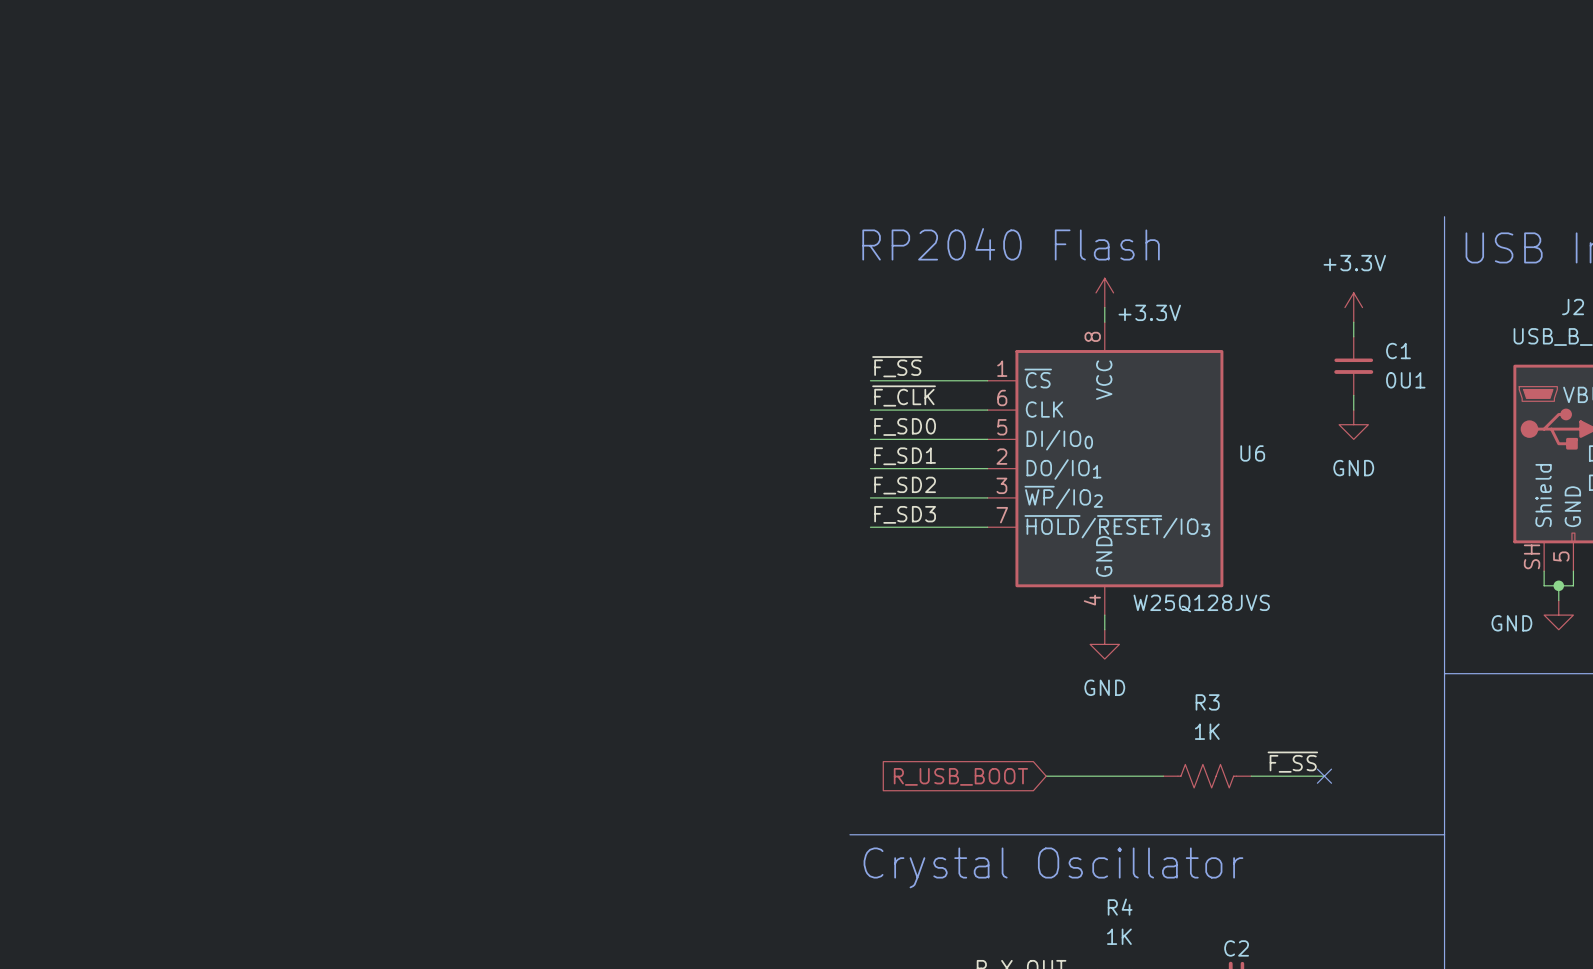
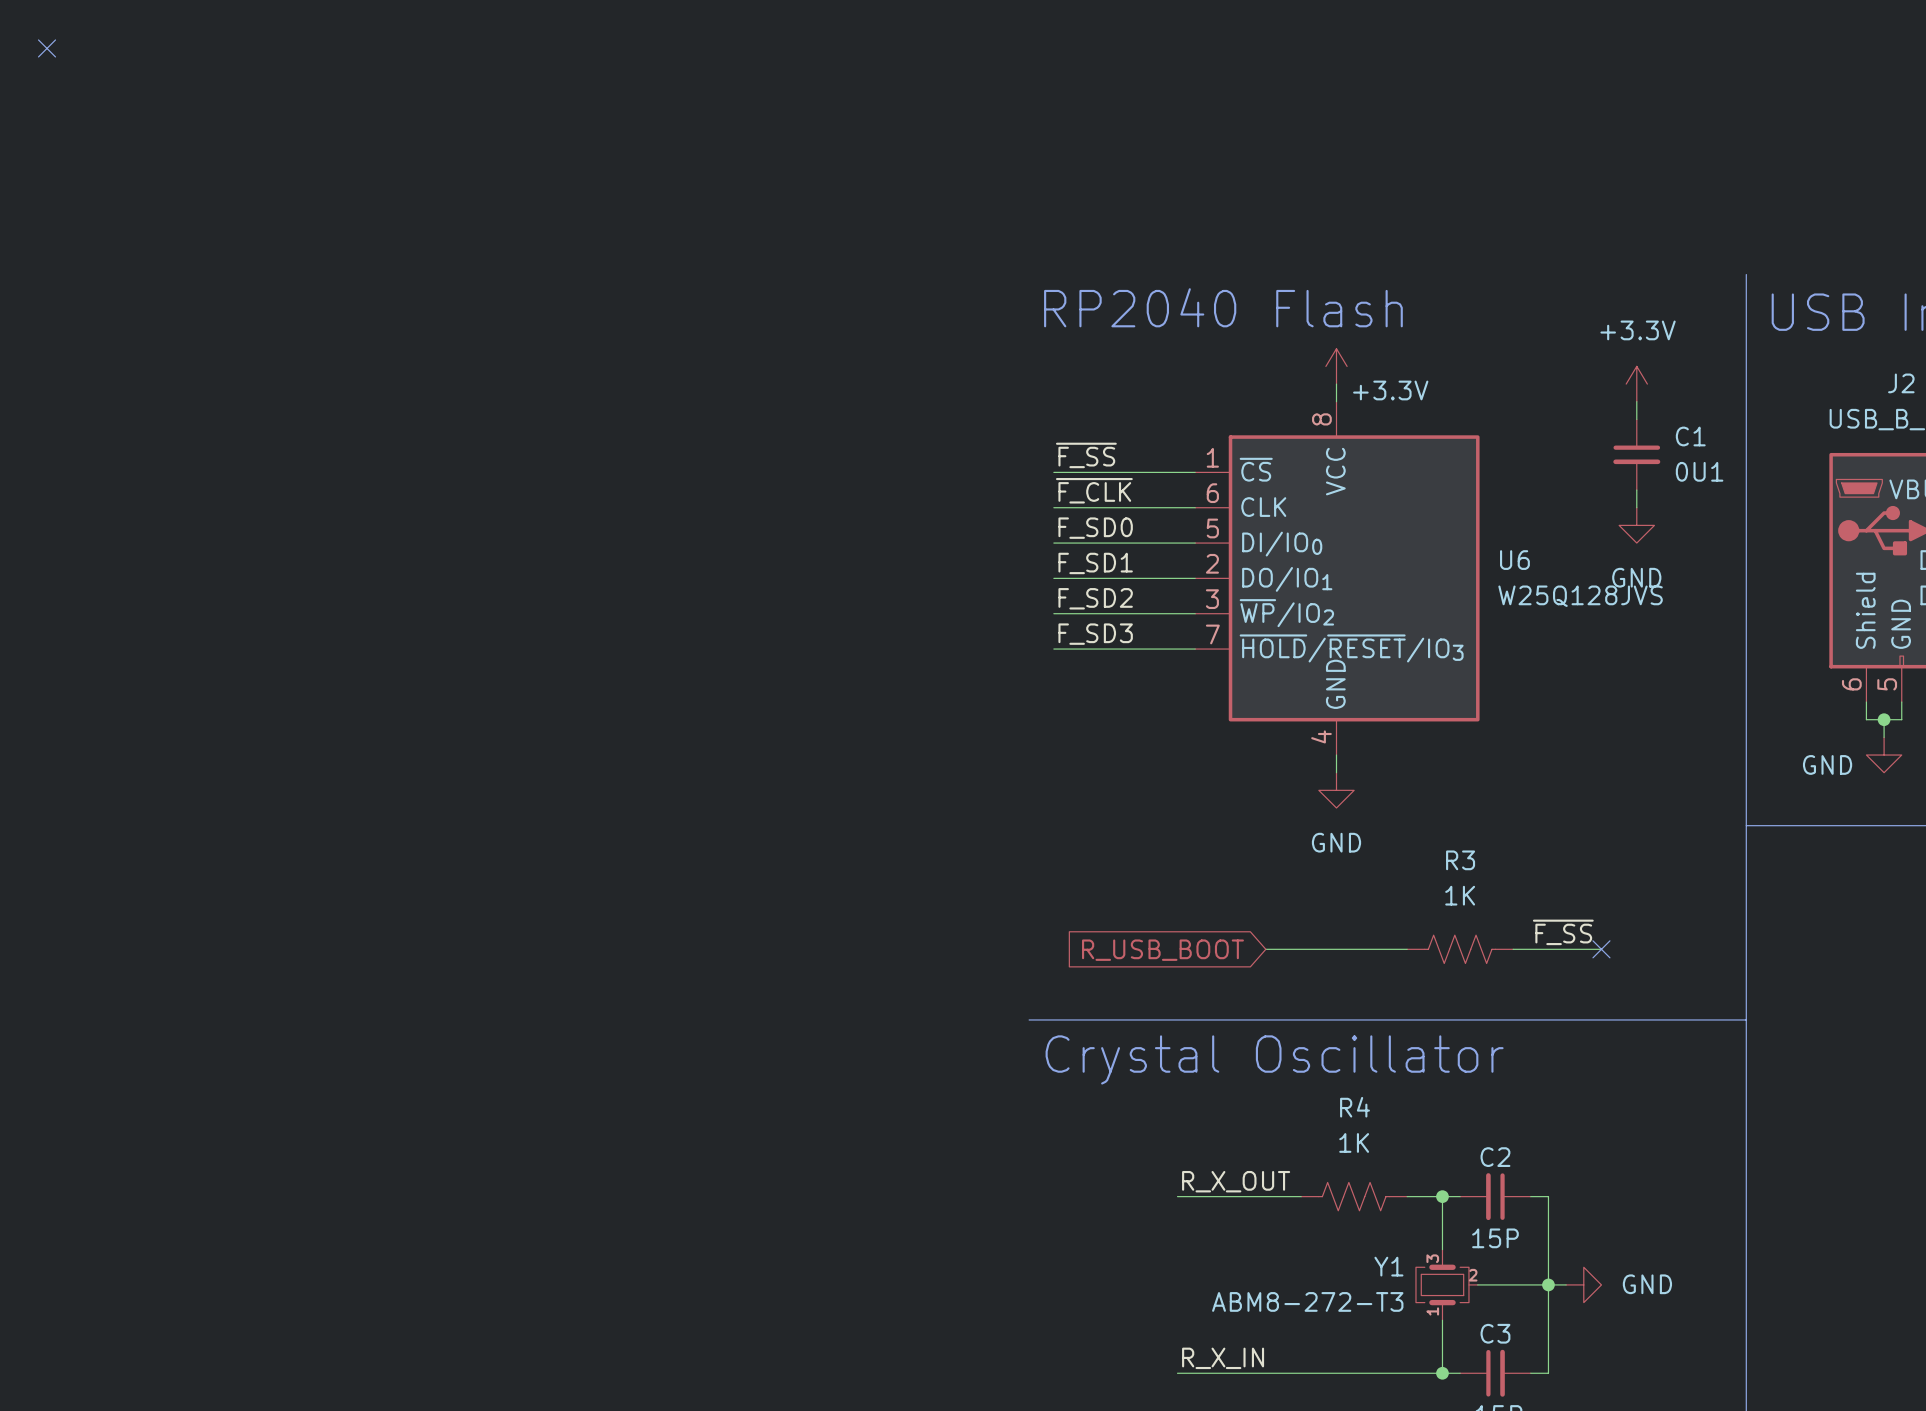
no-connect mark: none -> (47, 48)
J2 pin number: SH (1532, 556) -> 6 (1851, 684)
U6 value position: W25Q128JVS (1201, 603) -> W25Q128JVS (1580, 596)

